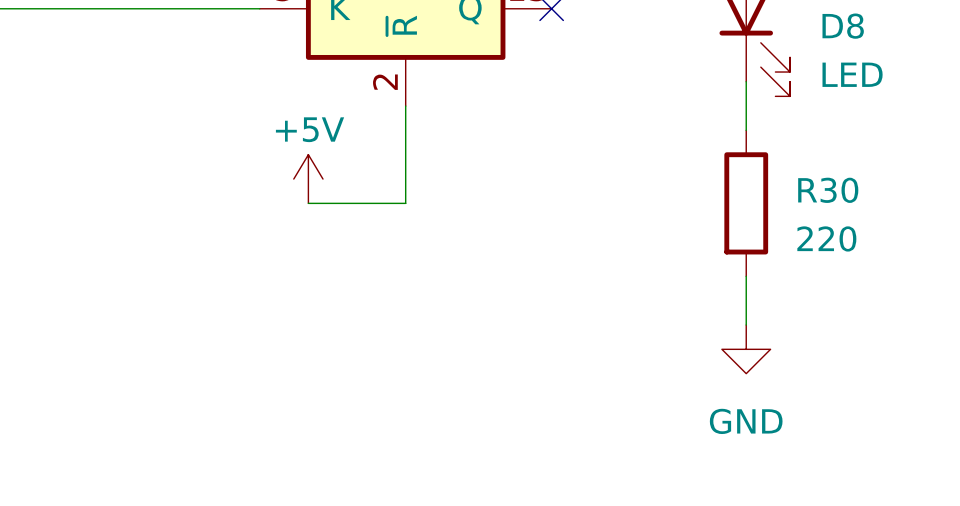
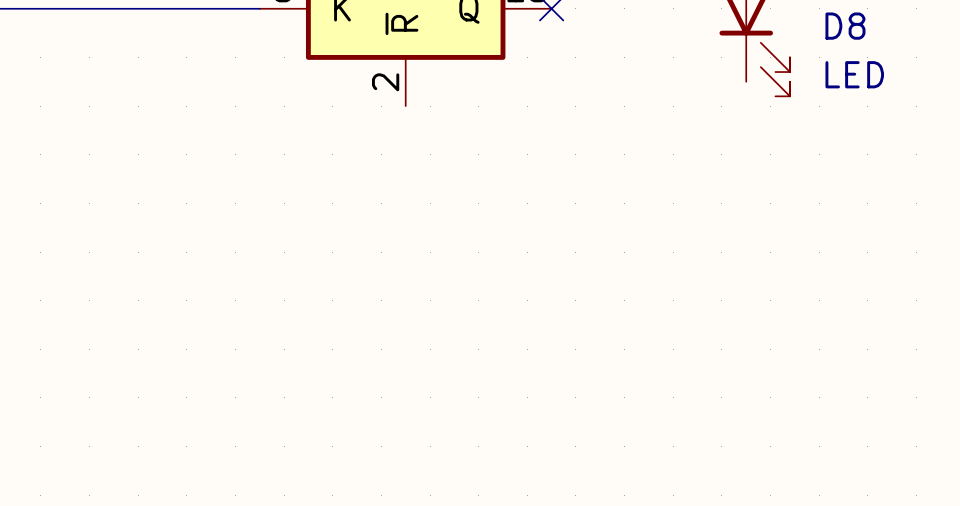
wire: (746, 81) (746, 130) -> none
wire: (405, 106) (405, 203) (308, 203) -> none
power symbol: +5V (308, 179) -> none
R30: 220 (746, 203) -> none
wire: (746, 276) (746, 325) -> none
power symbol: GND (746, 349) -> none

